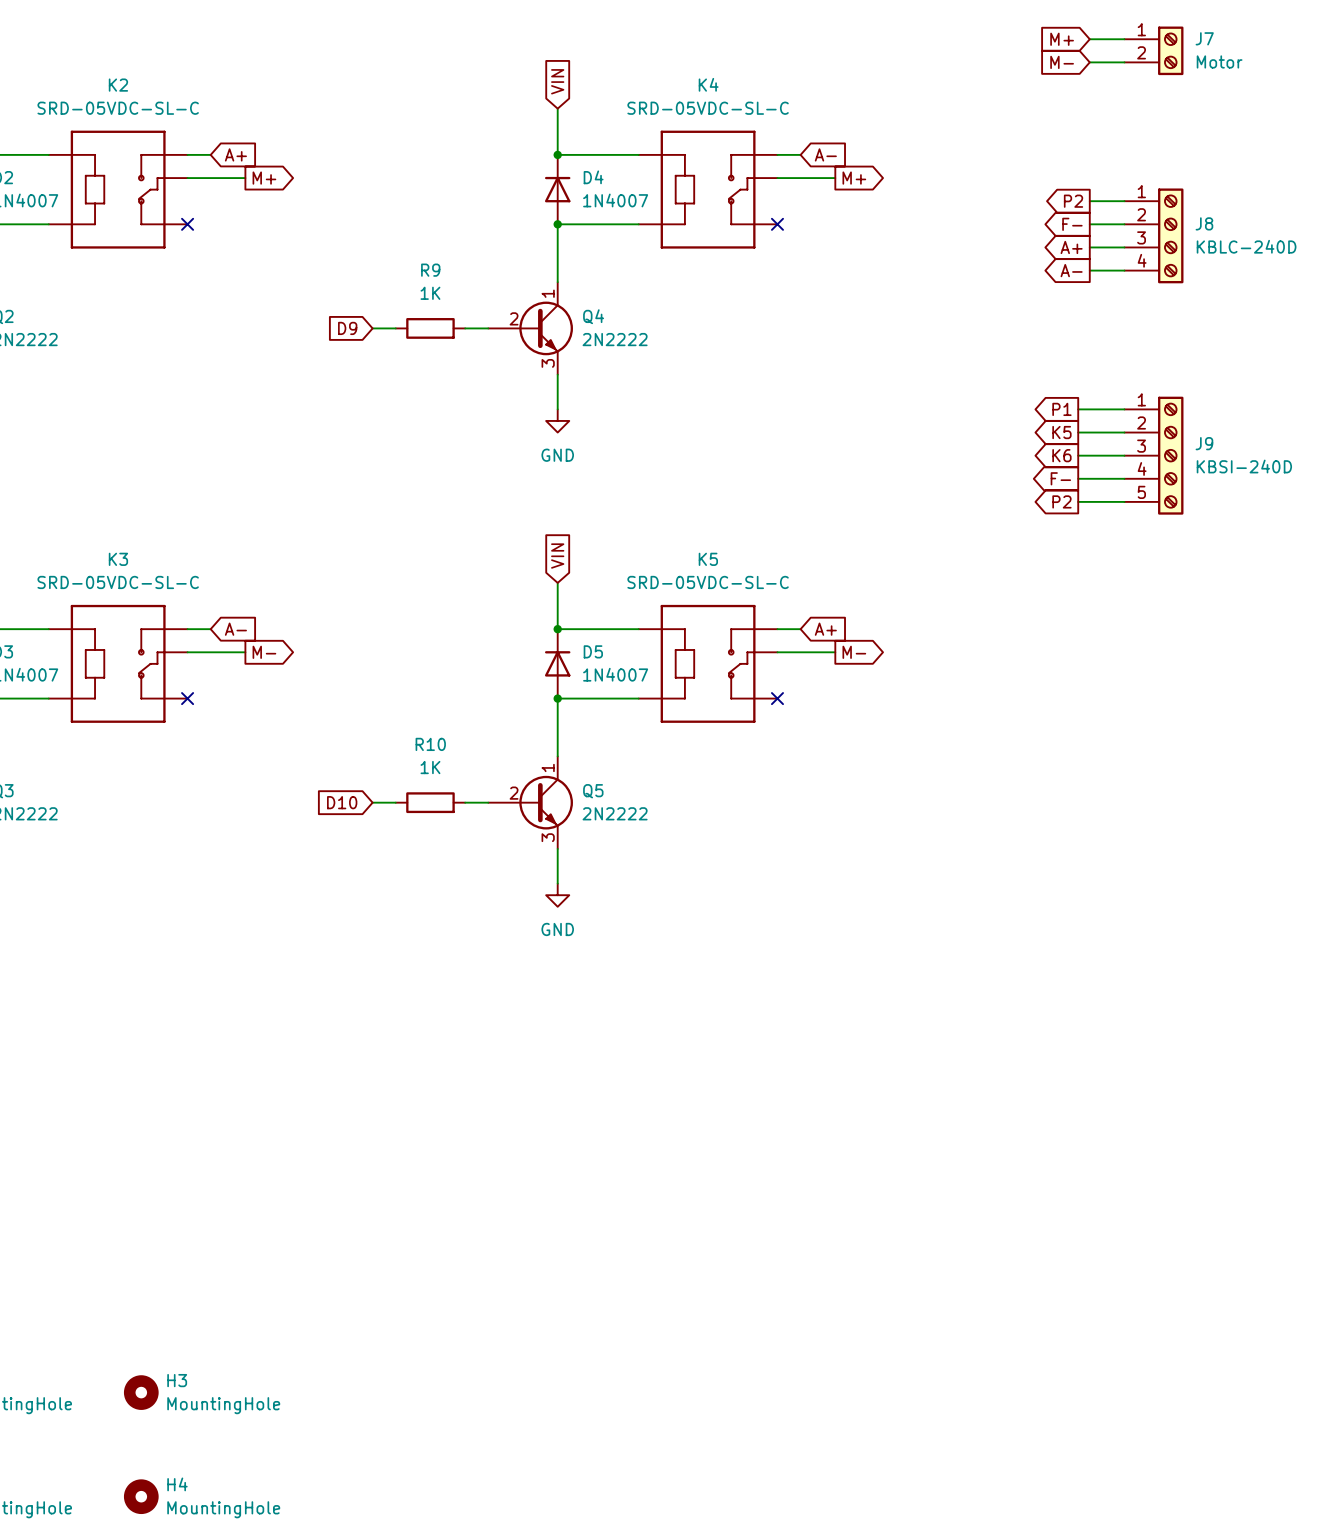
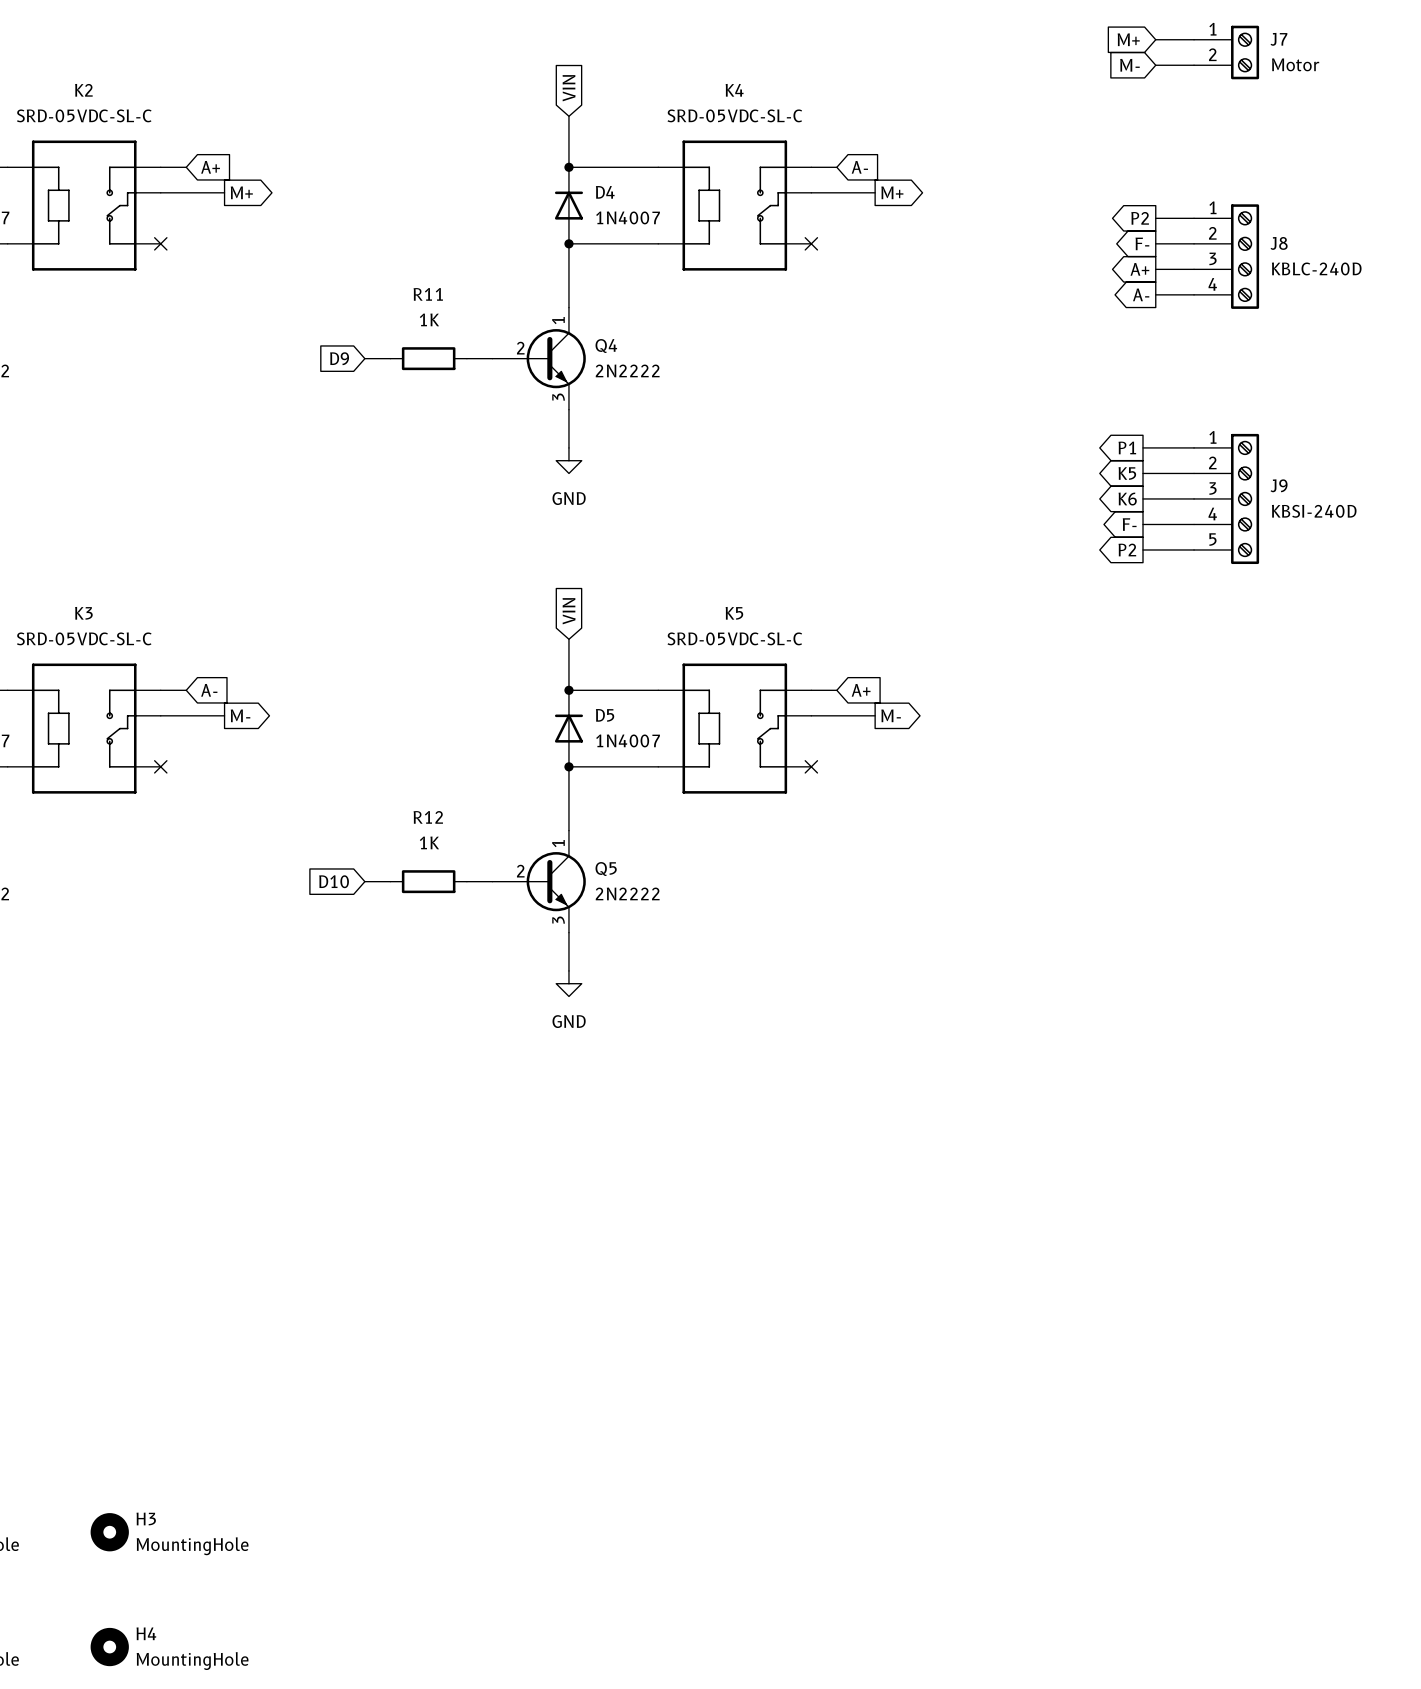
R9 name: R9 (430, 270) -> R11 (428, 294)
R10 name: R10 (430, 744) -> R12 (428, 817)

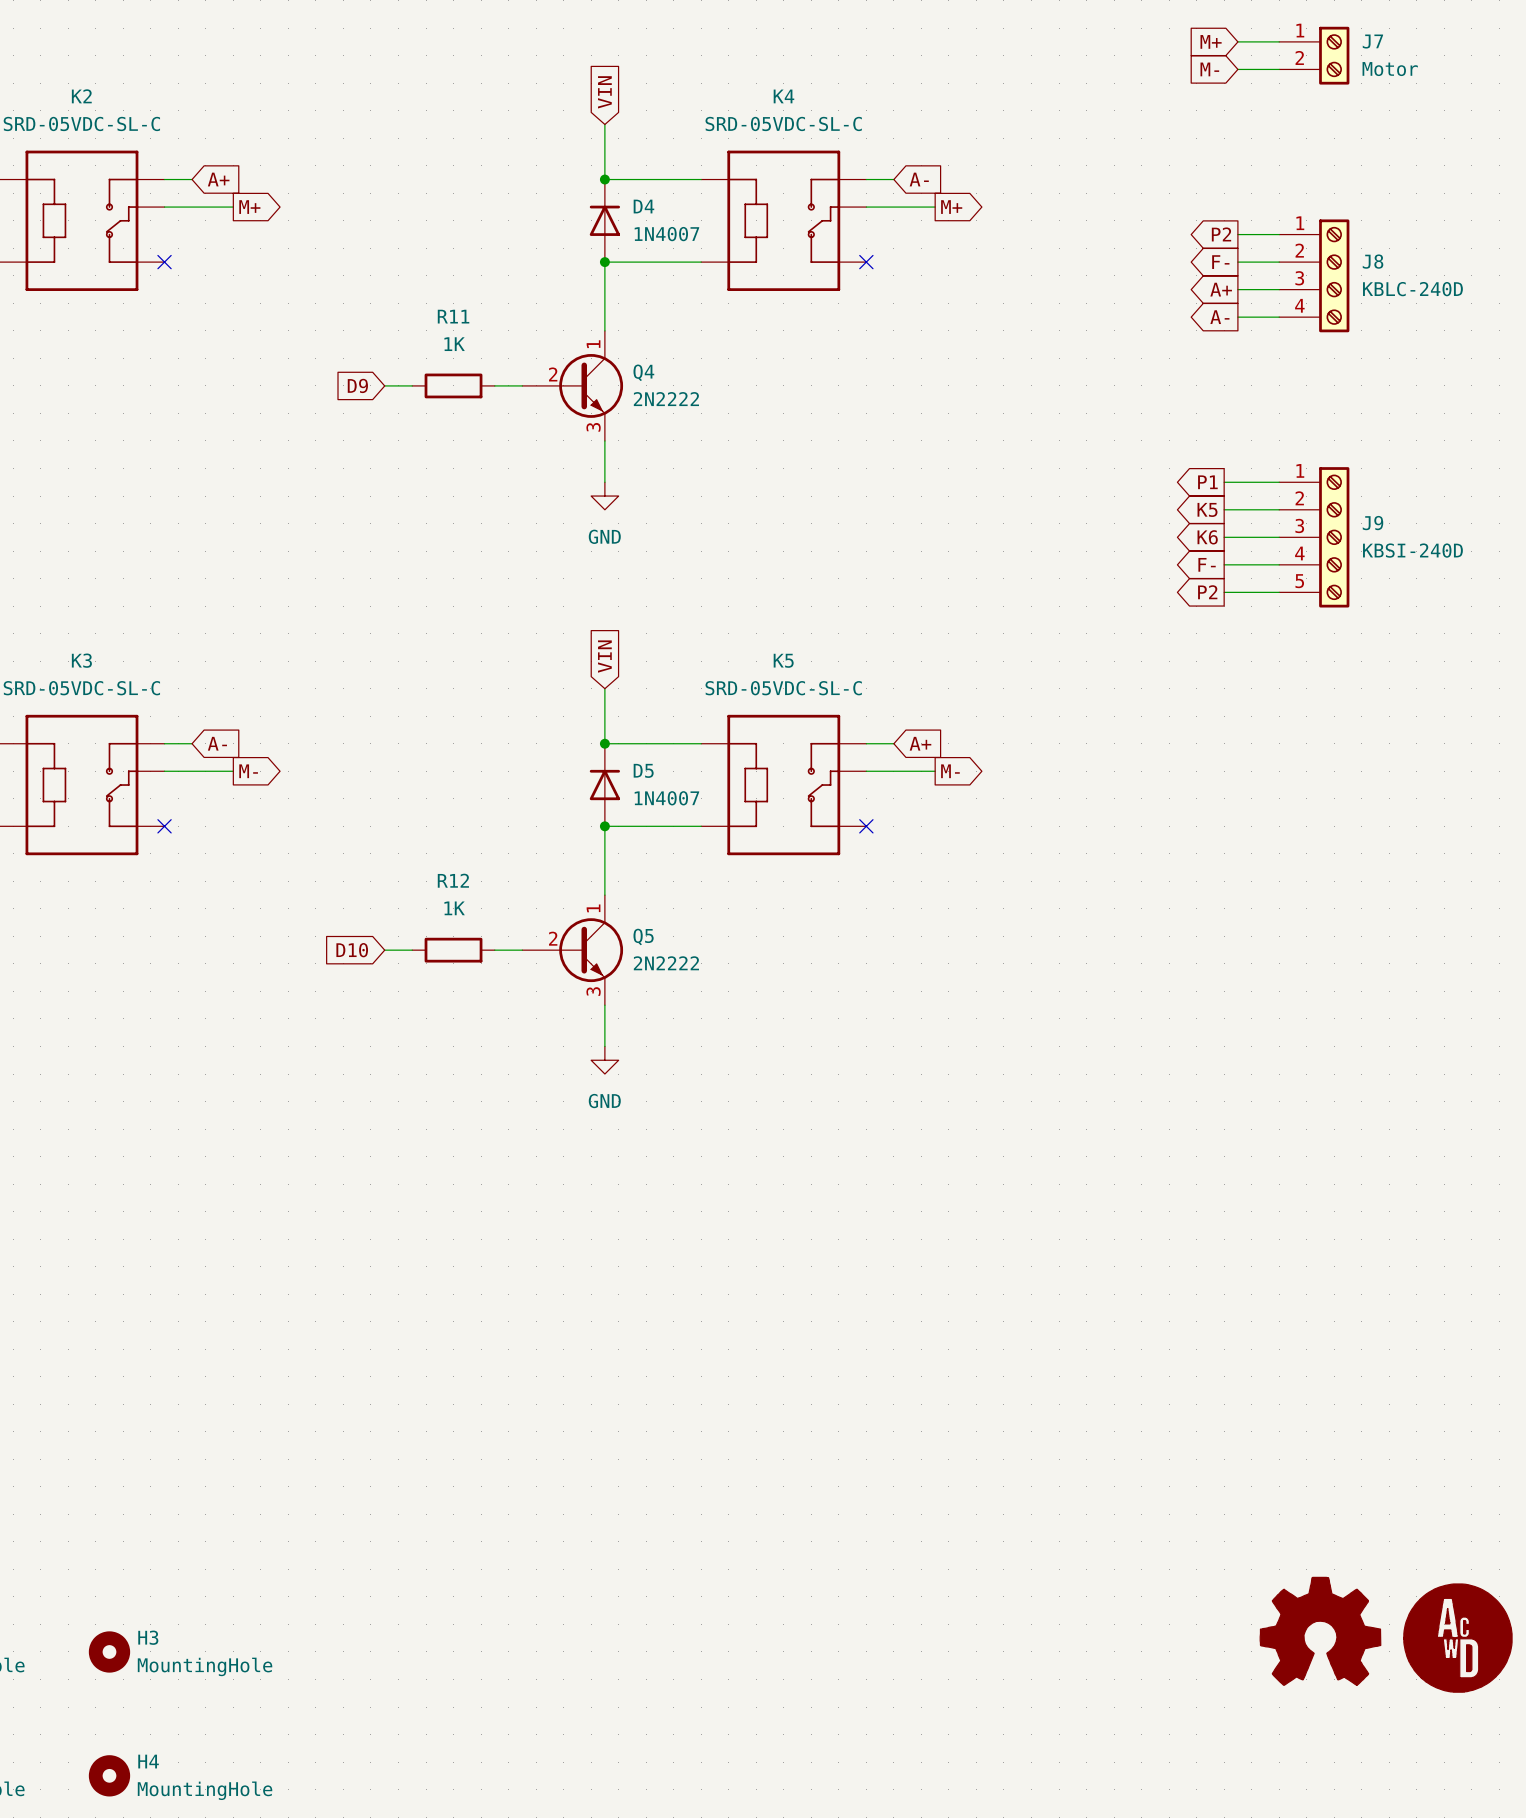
power symbol: none -> (1320, 1631)
power symbol: none -> (1457, 1638)

